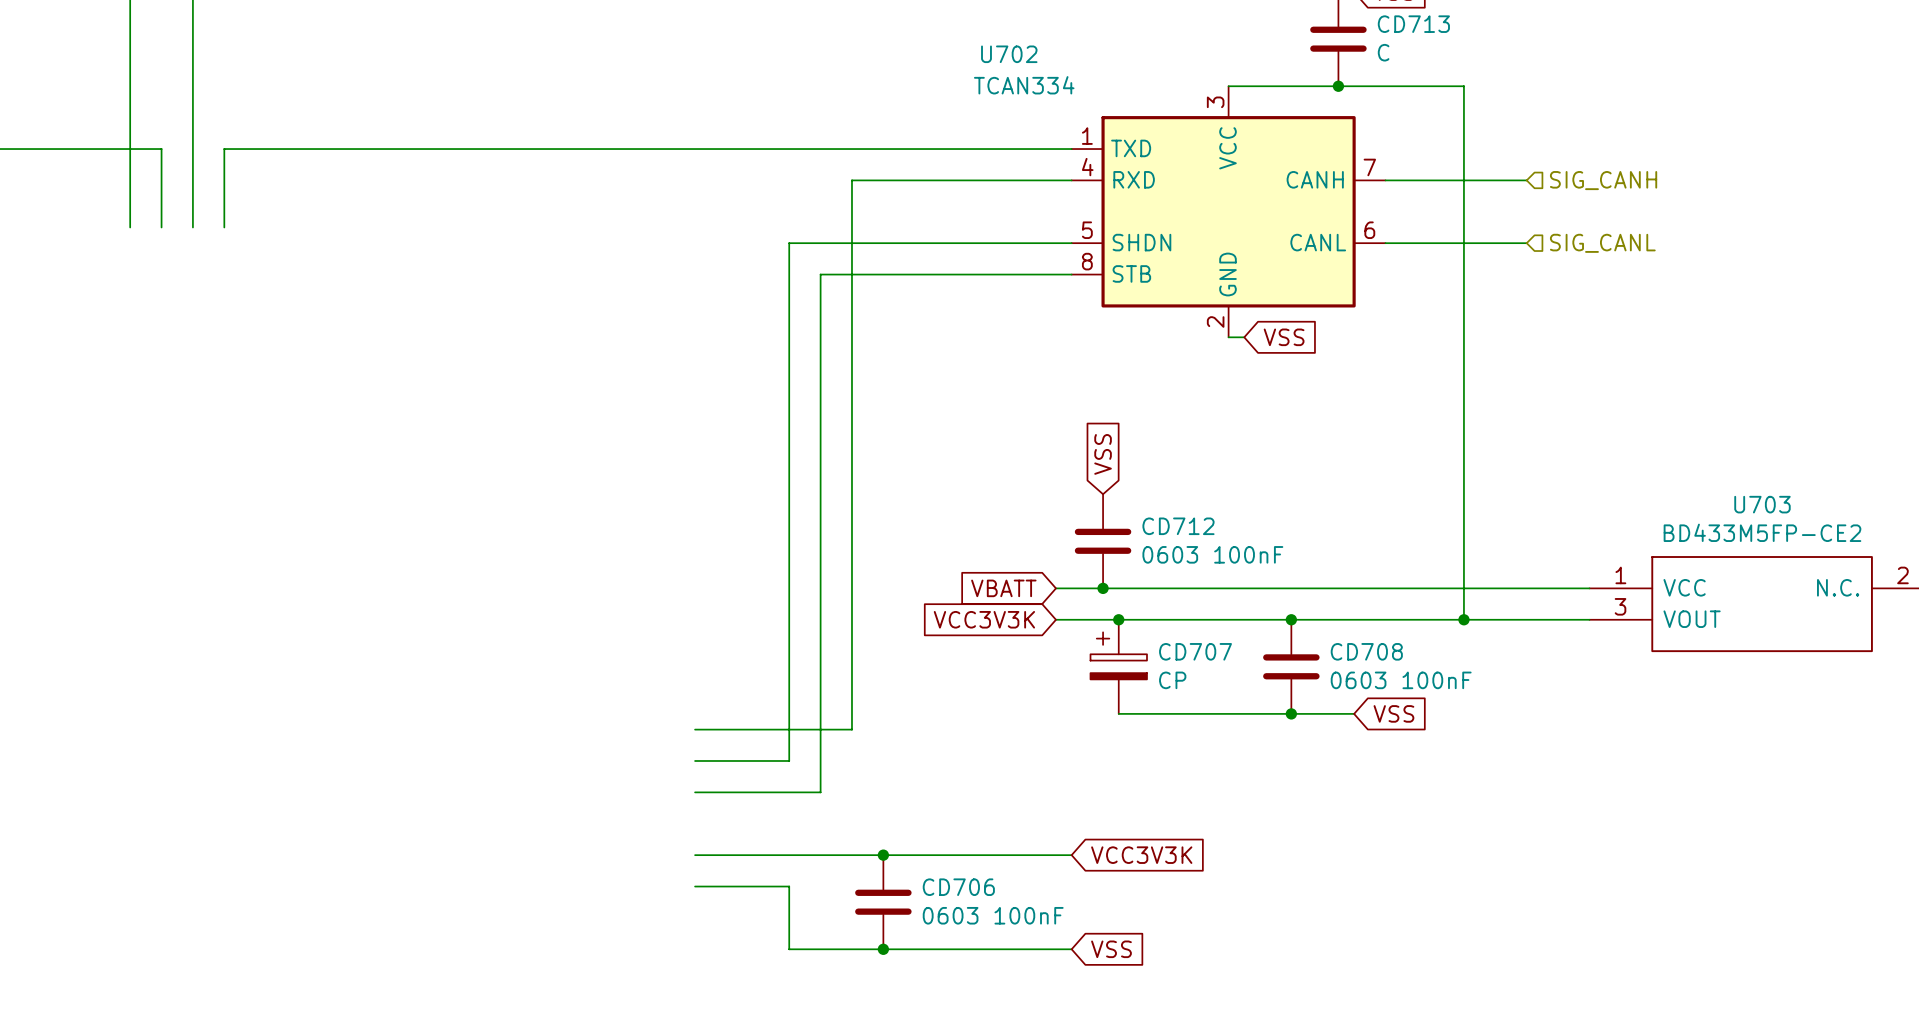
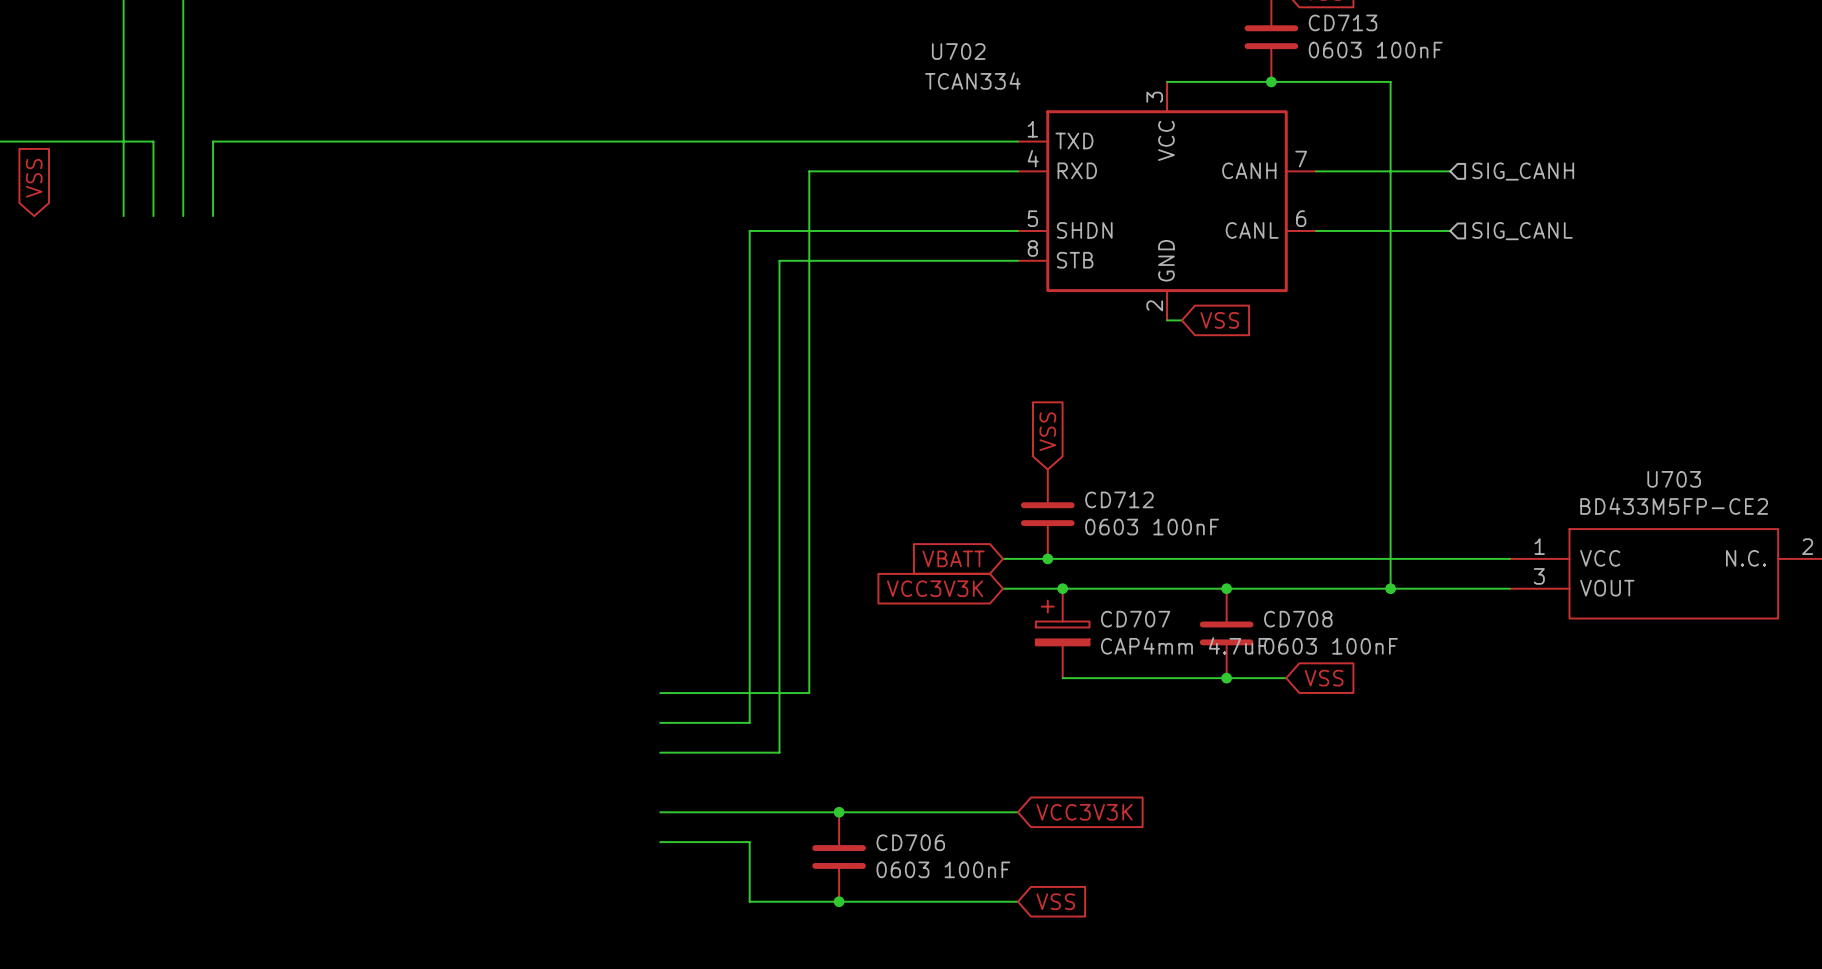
CD713 value: C (1383, 52) -> 0603 100nF (1375, 50)
global label: none -> VSS (34, 178)
CD707 value: CP (1172, 680) -> CAP4mm 4.7uF (1184, 645)

